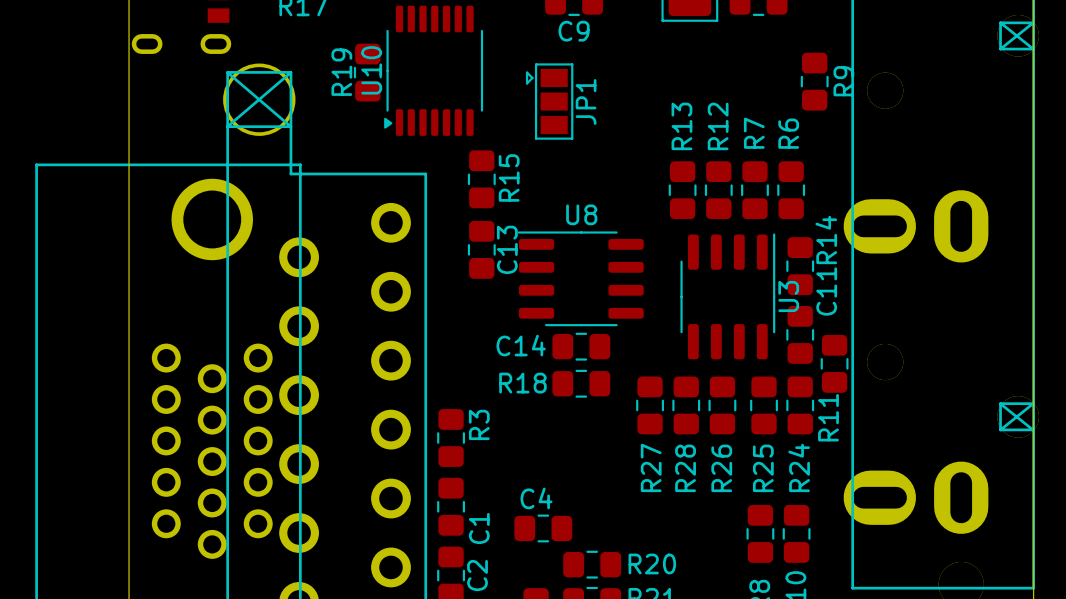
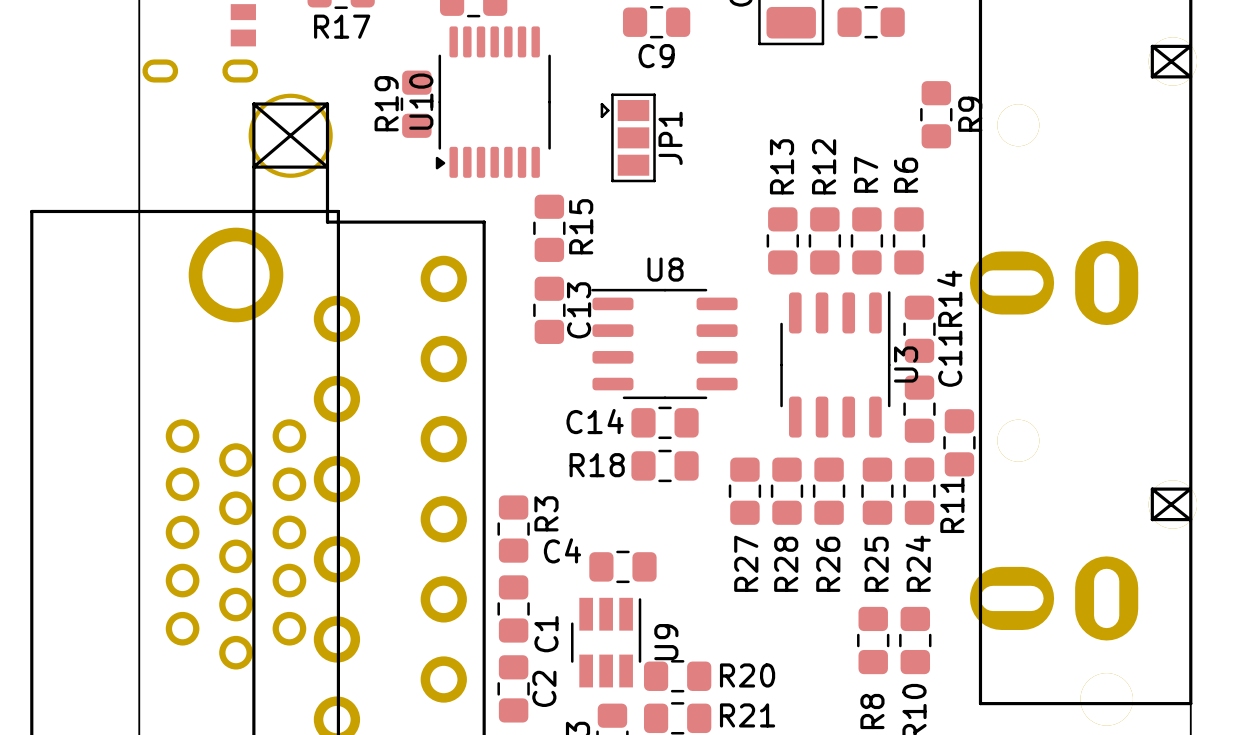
C4 name position: C4 (536, 498) -> C4 (562, 550)
C4 position: (543, 528) -> (622, 566)
U9: none -> (606, 642)

